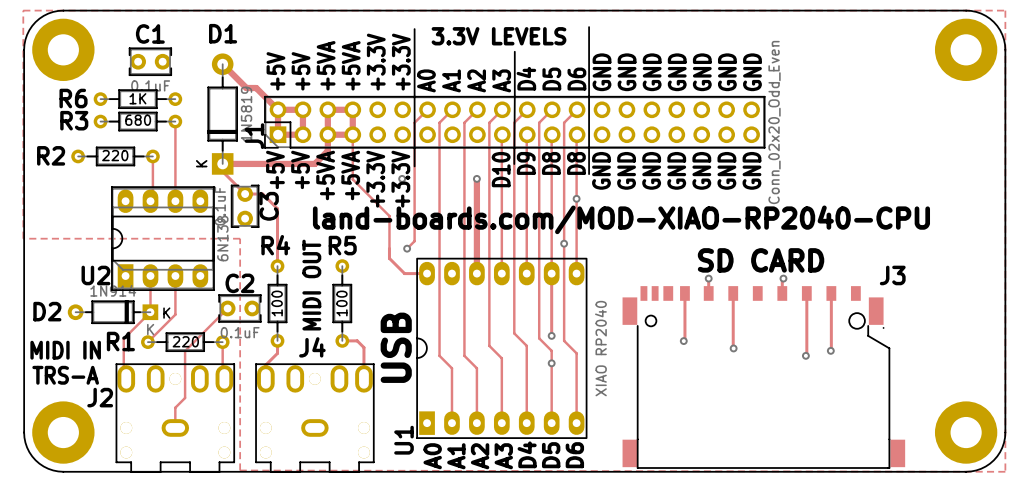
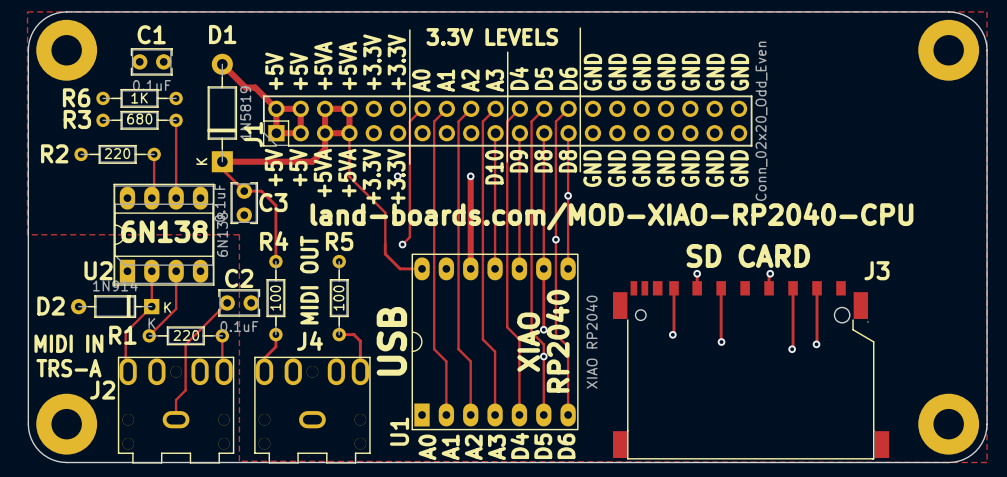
C3 name rotation: 0° (269, 206) -> 90° clockwise (273, 202)
text: none -> 6N138 (164, 231)
text: none -> RP2040 (557, 341)
text: none -> XIAO (528, 342)

